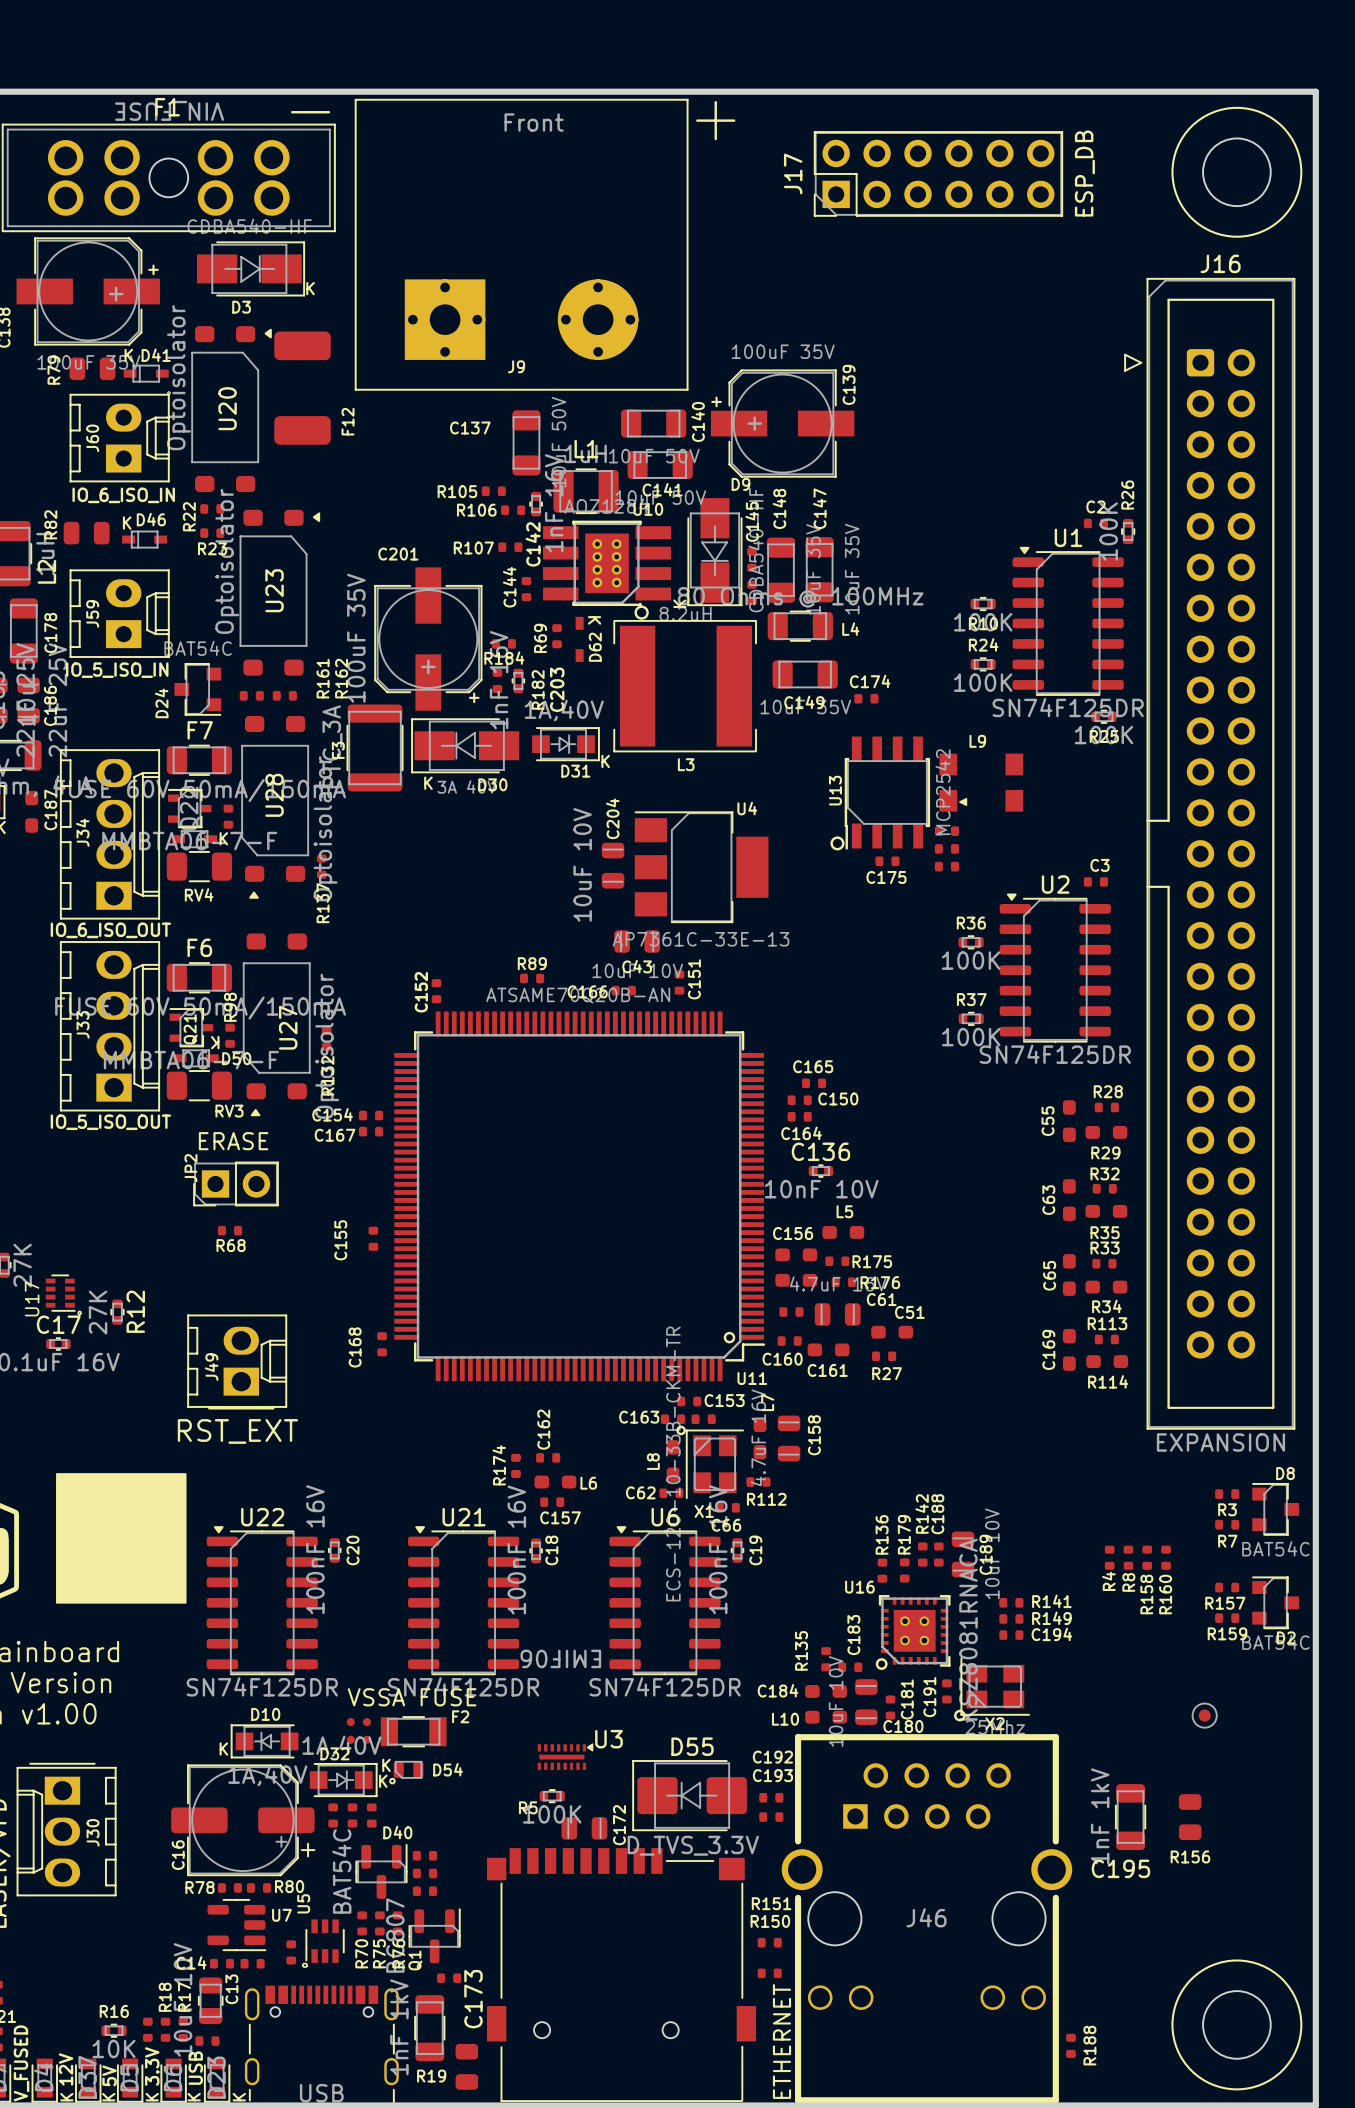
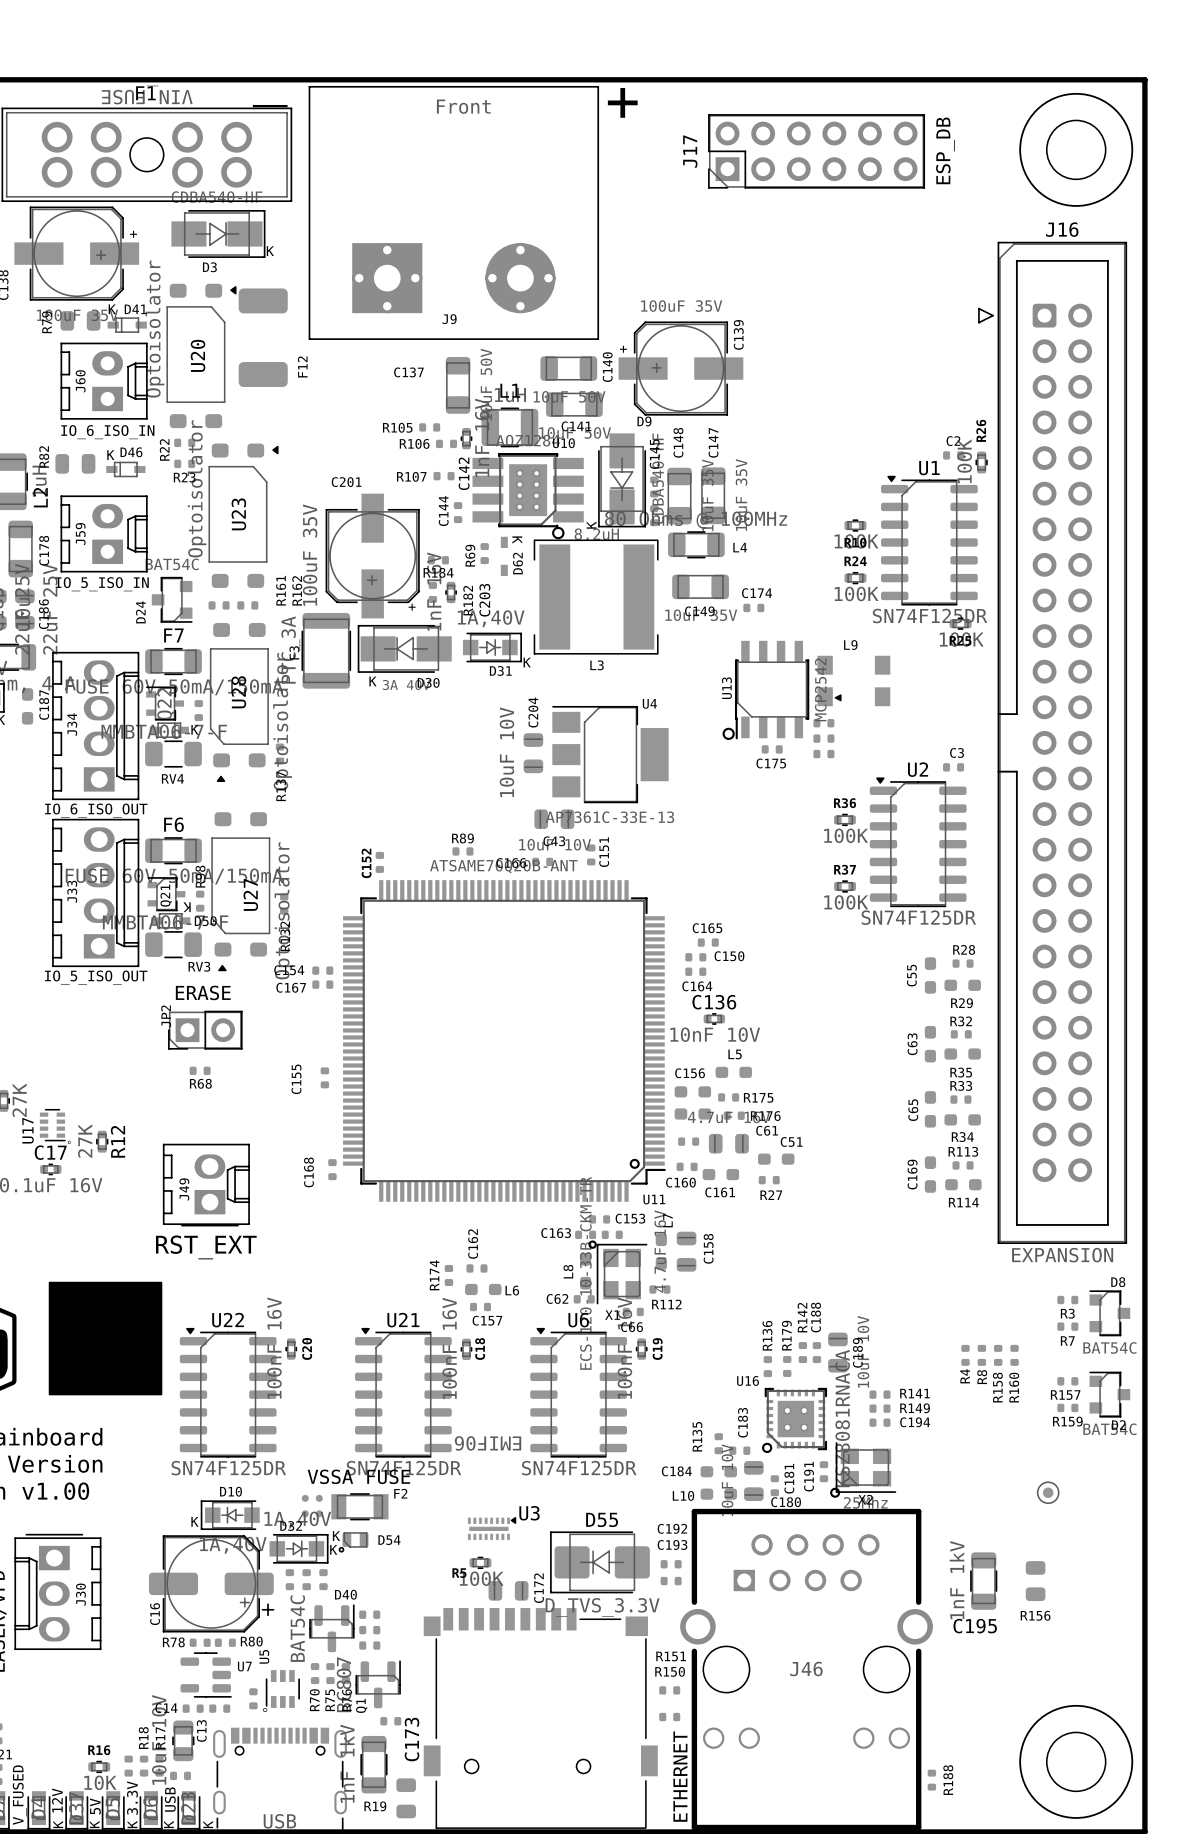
U11 value: ATSAME70Q20B-AN (578, 995) -> ATSAME70Q20B-ANT (503, 866)

